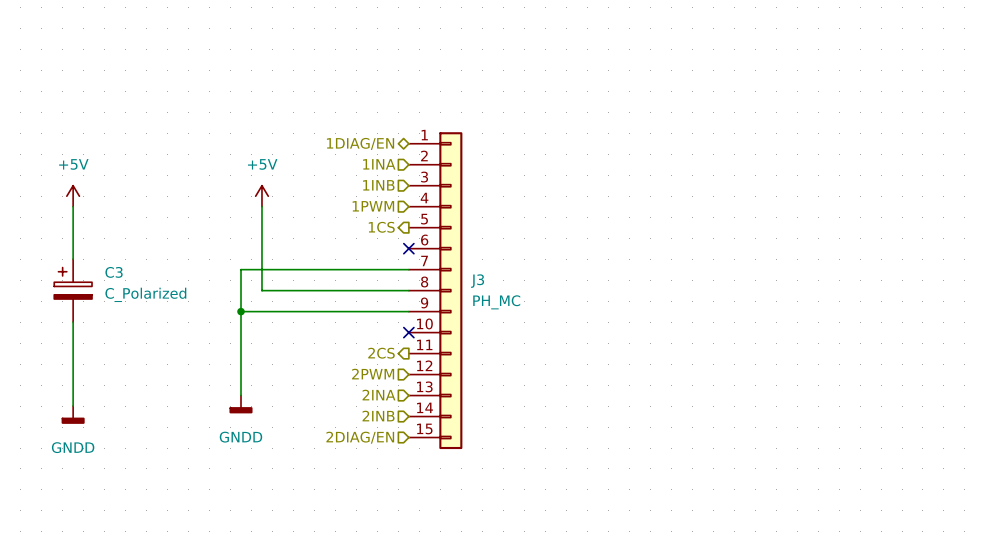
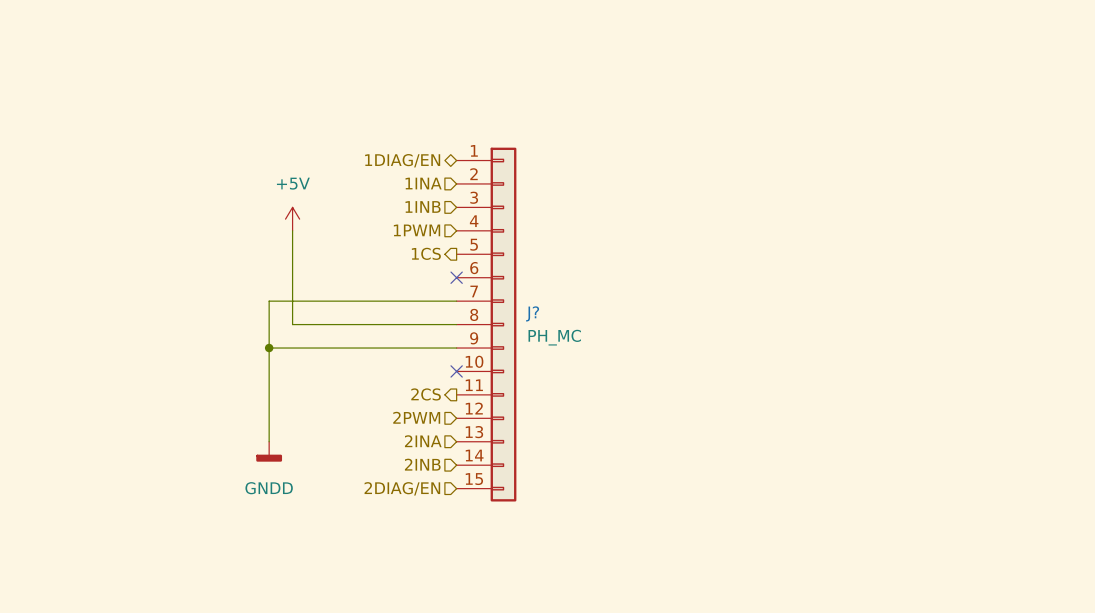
power symbol: +5V (73, 196) -> none
wire: (73, 206) (73, 259) -> none
J3 name: J3 (477, 281) -> J? (532, 313)
C3: C_Polarized (73, 290) -> none
wire: (73, 322) (73, 406) -> none
power symbol: GNDD (73, 414) -> none

